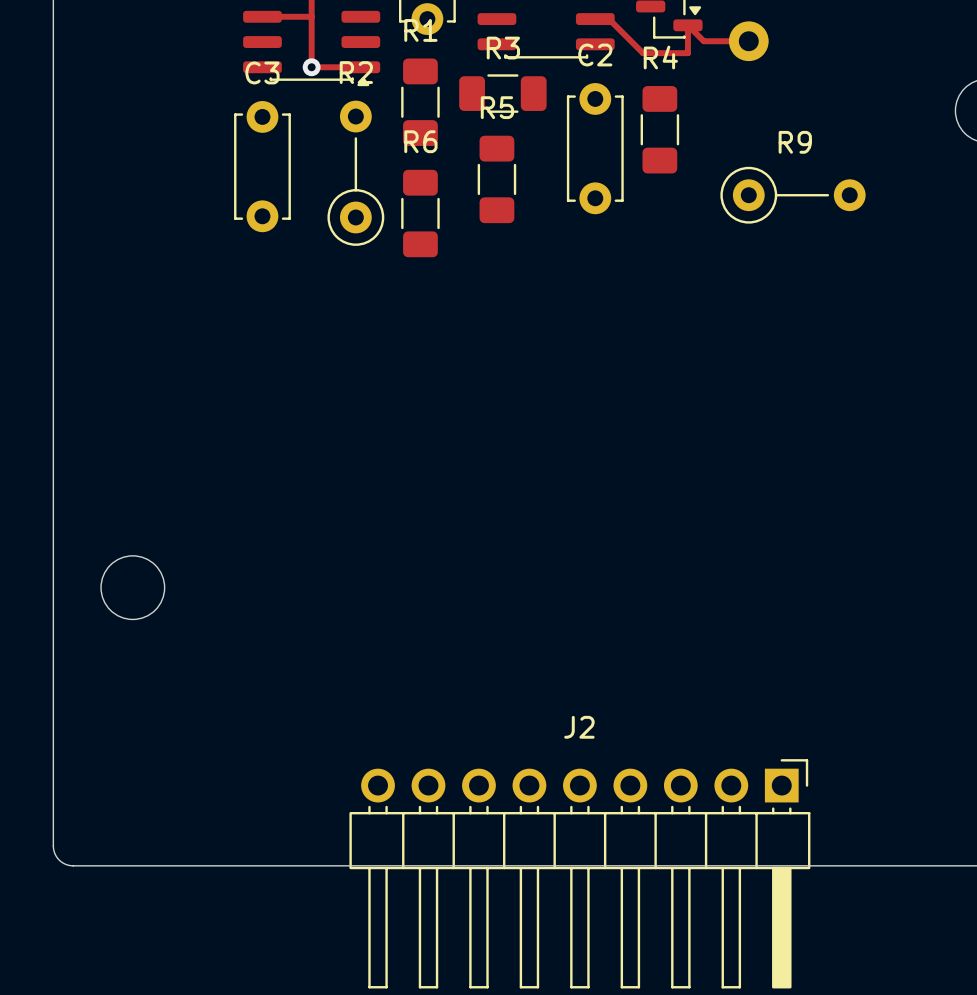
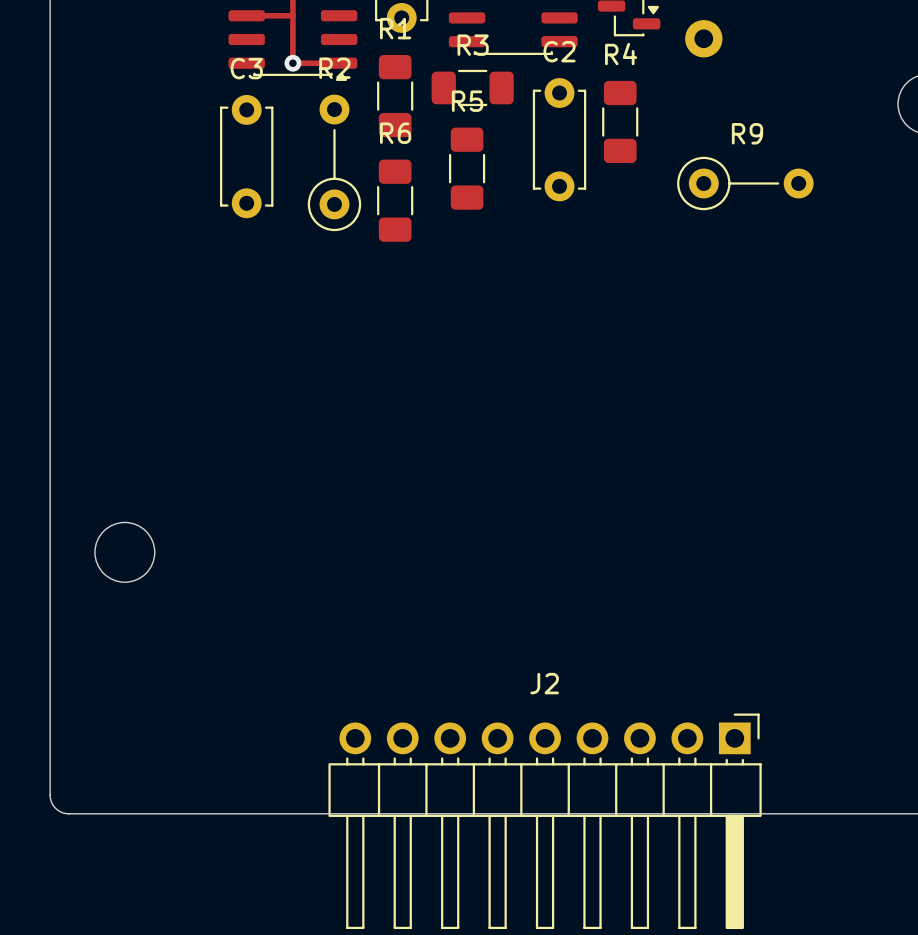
top track: (595, 19) (608, 19) (642, 53) (687, 53) (687, 25) (703, 41) (748, 41) -> none

